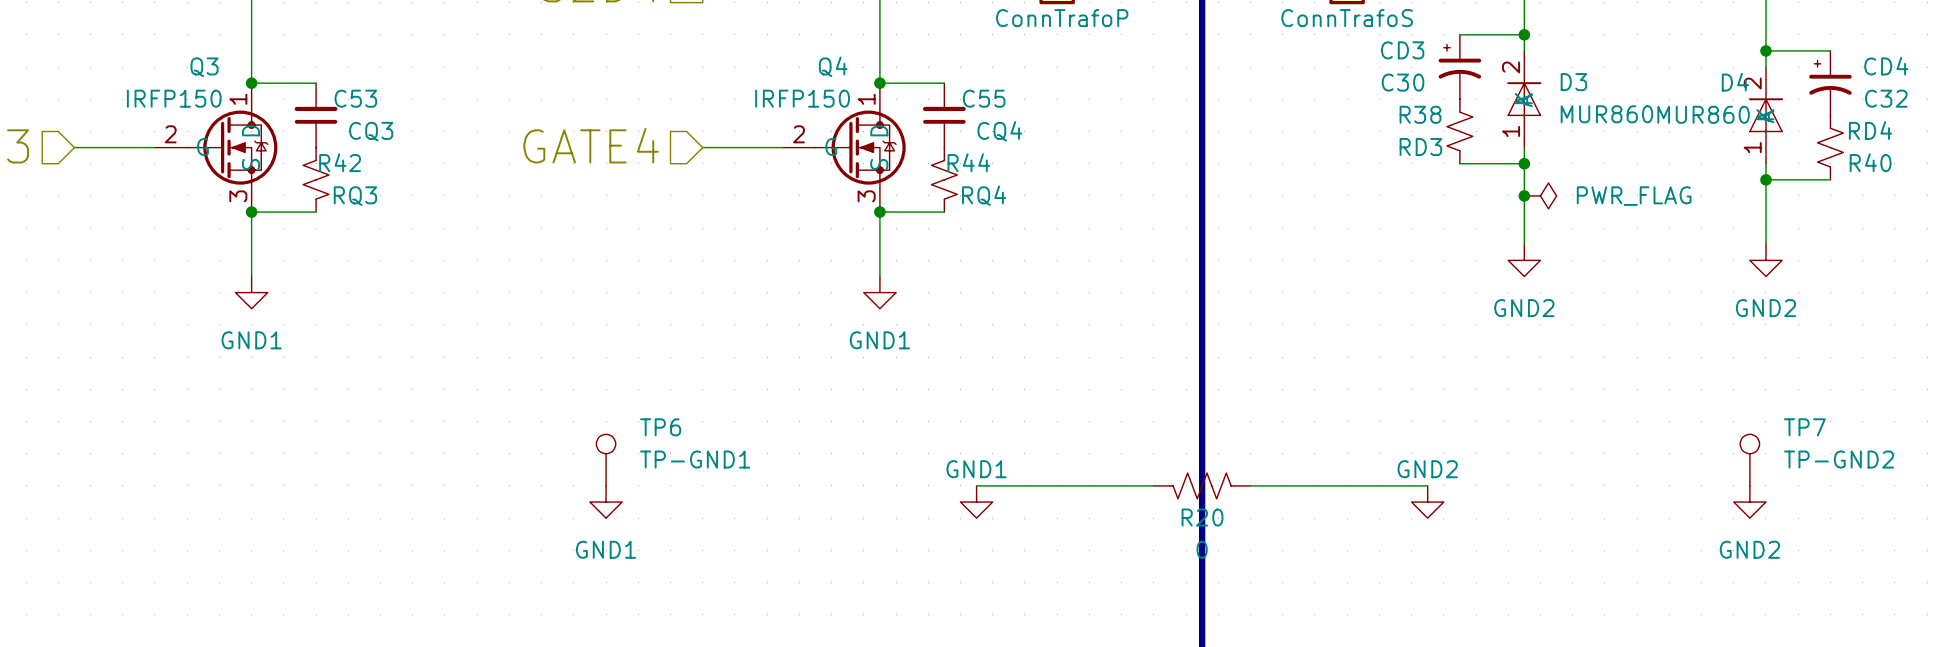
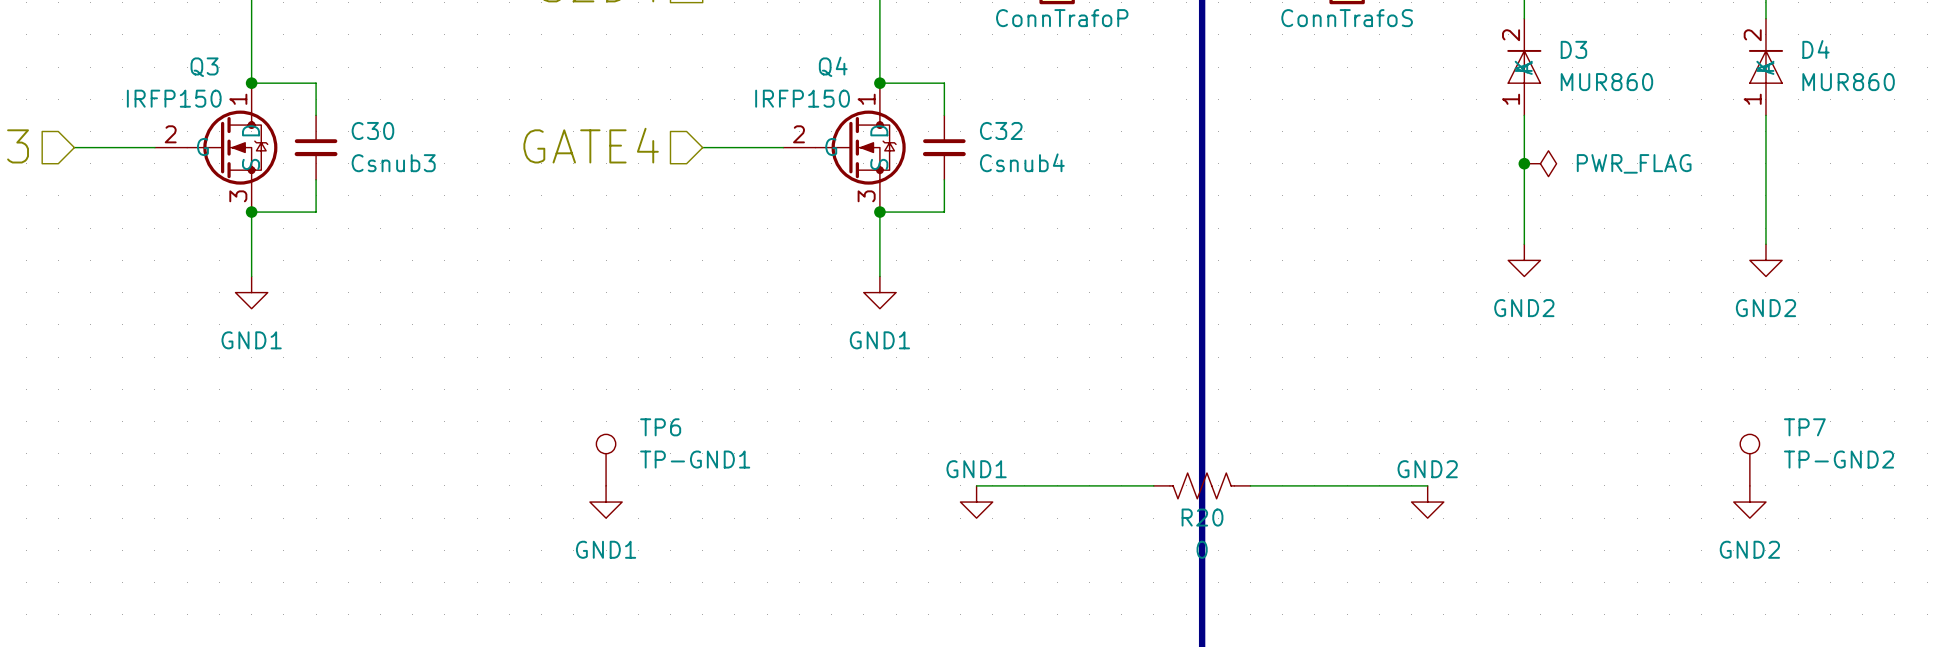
C30 symbol: [1438, 34, 1482, 100] -> [294, 115, 338, 180]
wire: (1459, 34) (1524, 34) -> none
junction: (1524, 34) -> none
C30 value: CD3 (1402, 50) -> Csnub3 (393, 163)
wire: (1765, 50) (1830, 50) -> none
junction: (1765, 50) -> none
C32 symbol: [1809, 50, 1852, 116] -> [922, 115, 966, 180]
C32 value: CD4 (1886, 66) -> Csnub4 (1022, 162)
C30 name position: C30 (1403, 82) -> C30 (372, 130)
D4 name position: D4 (1735, 82) -> D4 (1815, 49)
C32 name position: C32 (1886, 98) -> C32 (1001, 130)
D3 position: (1524, 99) -> (1524, 67)
D4 value position: MUR860 (1703, 114) -> MUR860 (1848, 82)
C53: CQ3 (316, 115) -> none
C55: CQ4 (944, 115) -> none
D4 position: (1765, 115) -> (1765, 67)
R38: RD3 (1459, 131) -> none
R40: RD4 (1830, 147) -> none
wire: (1459, 163) (1524, 163) -> none
R42: RQ3 (316, 179) -> none
R44: RQ4 (944, 179) -> none
wire: (1765, 179) (1830, 179) -> none
junction: (1765, 179) -> none
junction: (1524, 195) -> none
power symbol position: PWR_FLAG (1540, 195) -> PWR_FLAG (1540, 163)

